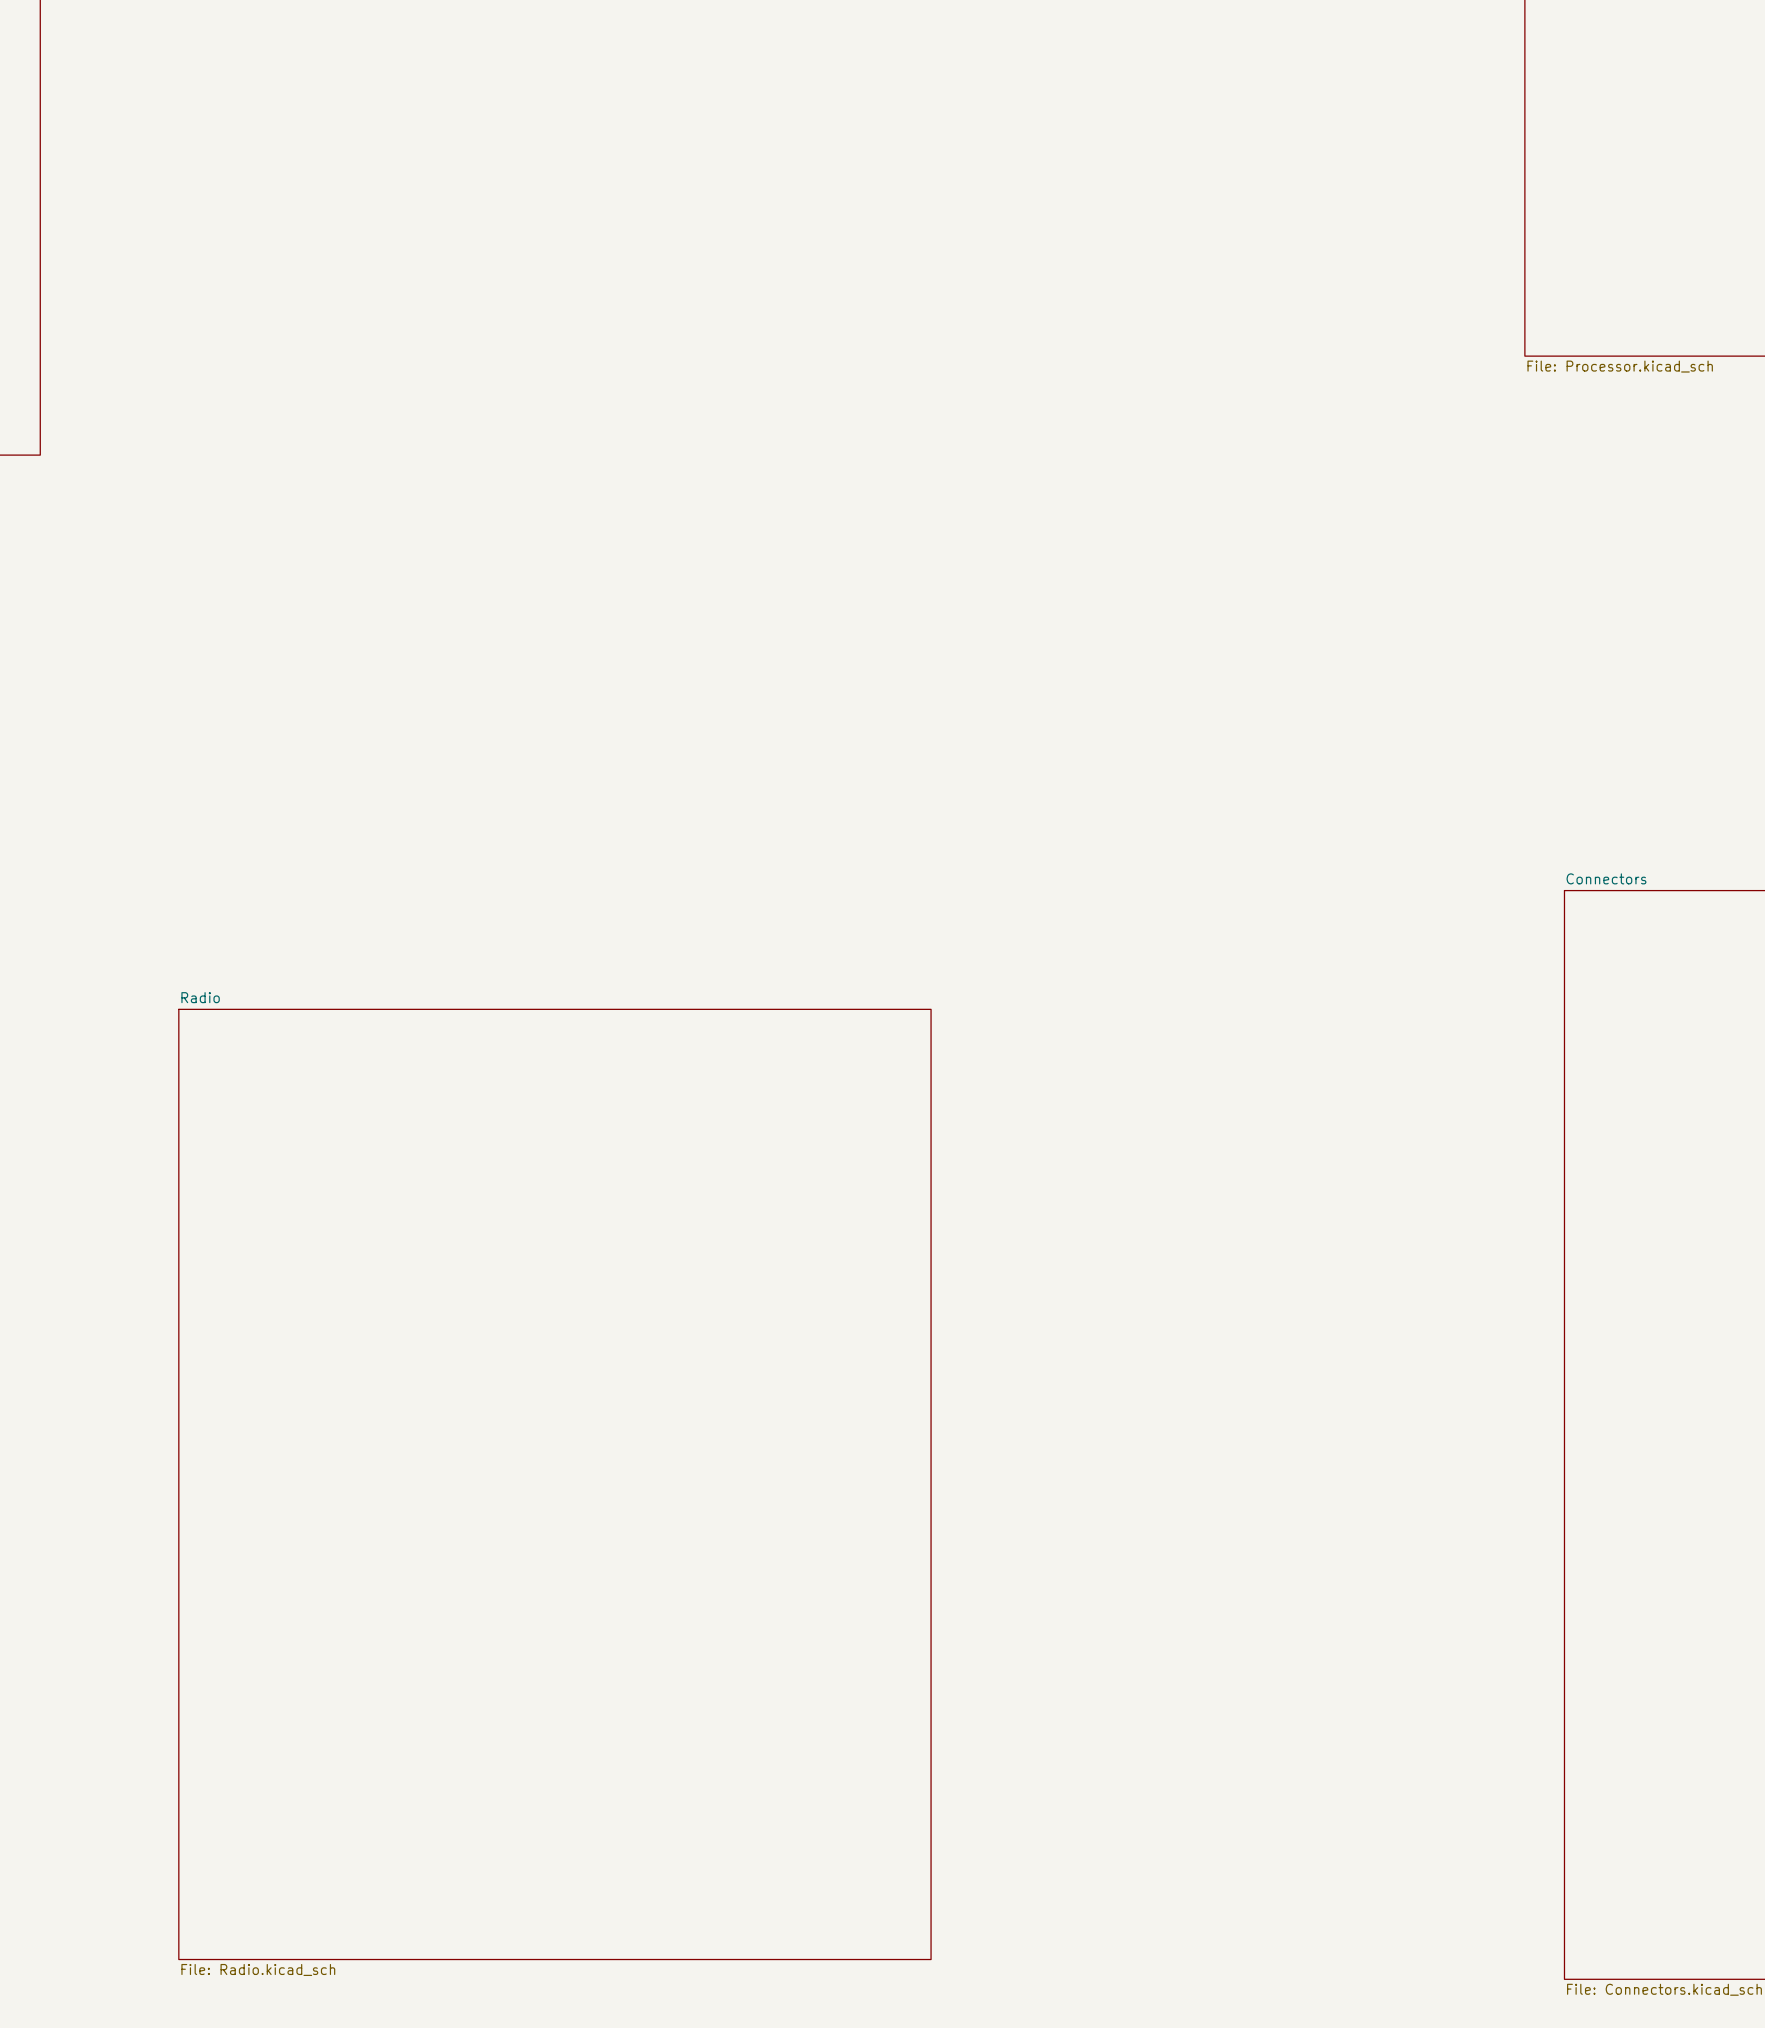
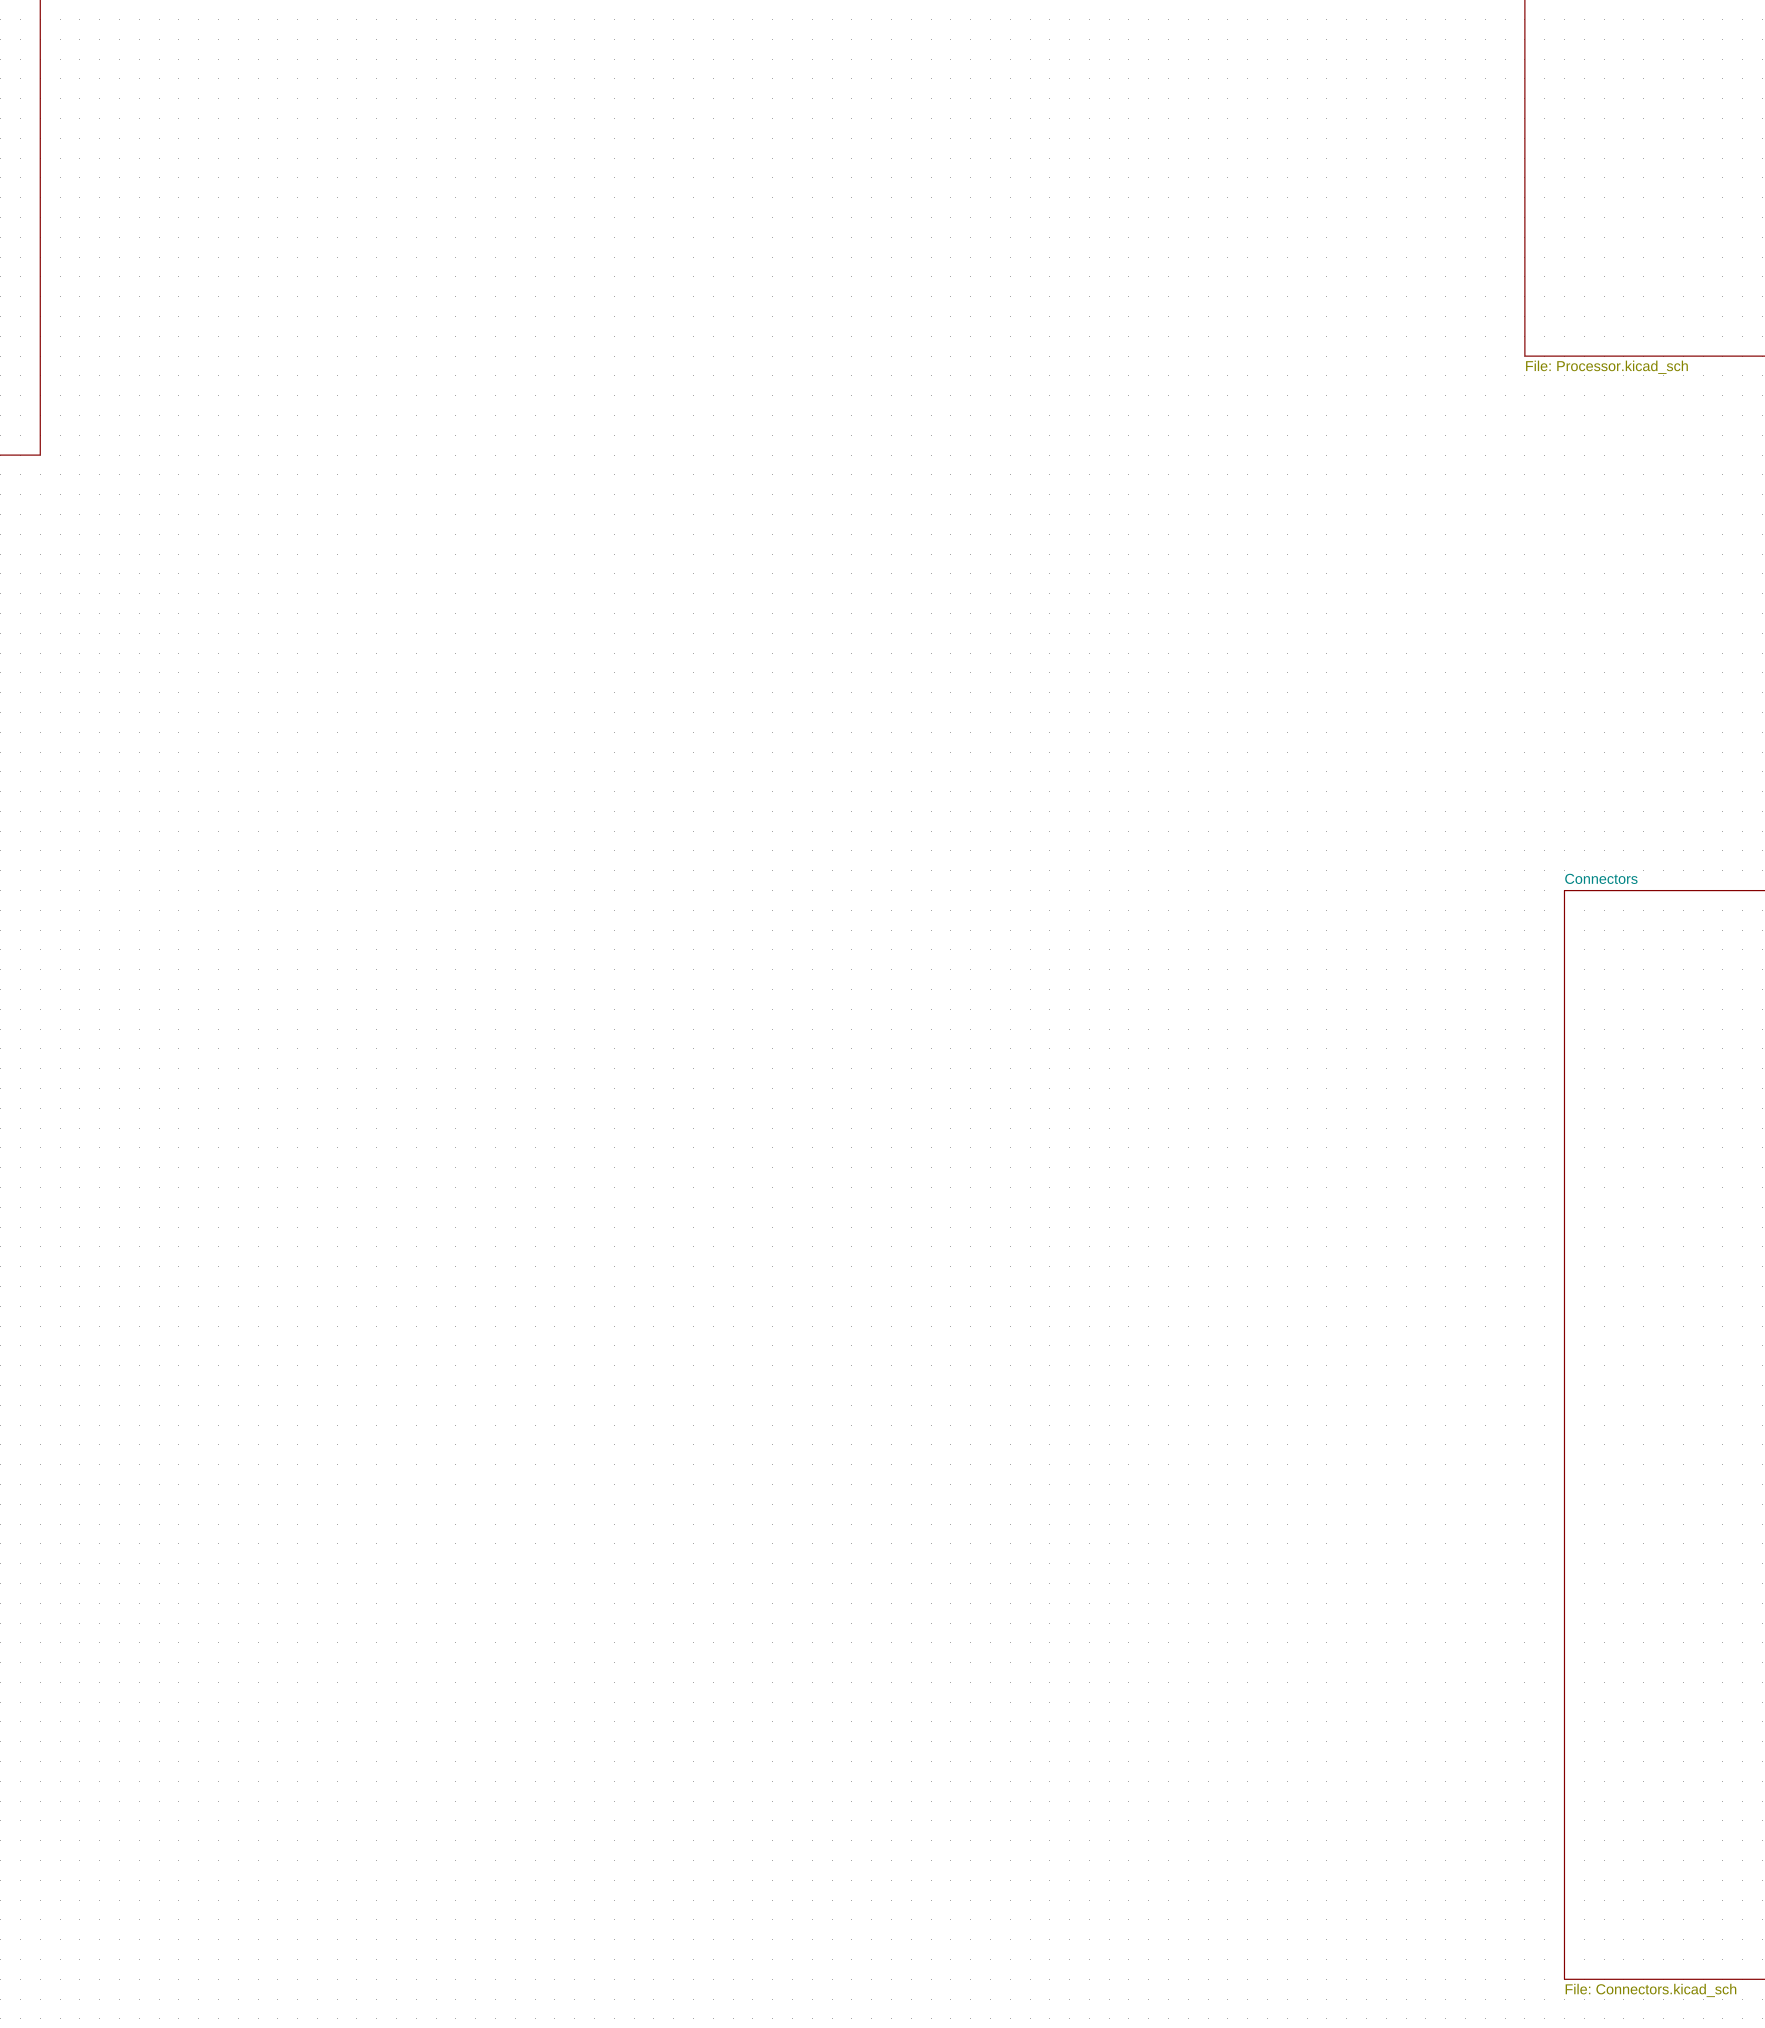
sheet Radio: File: Radio.kicad_sch (554, 1484) -> none

